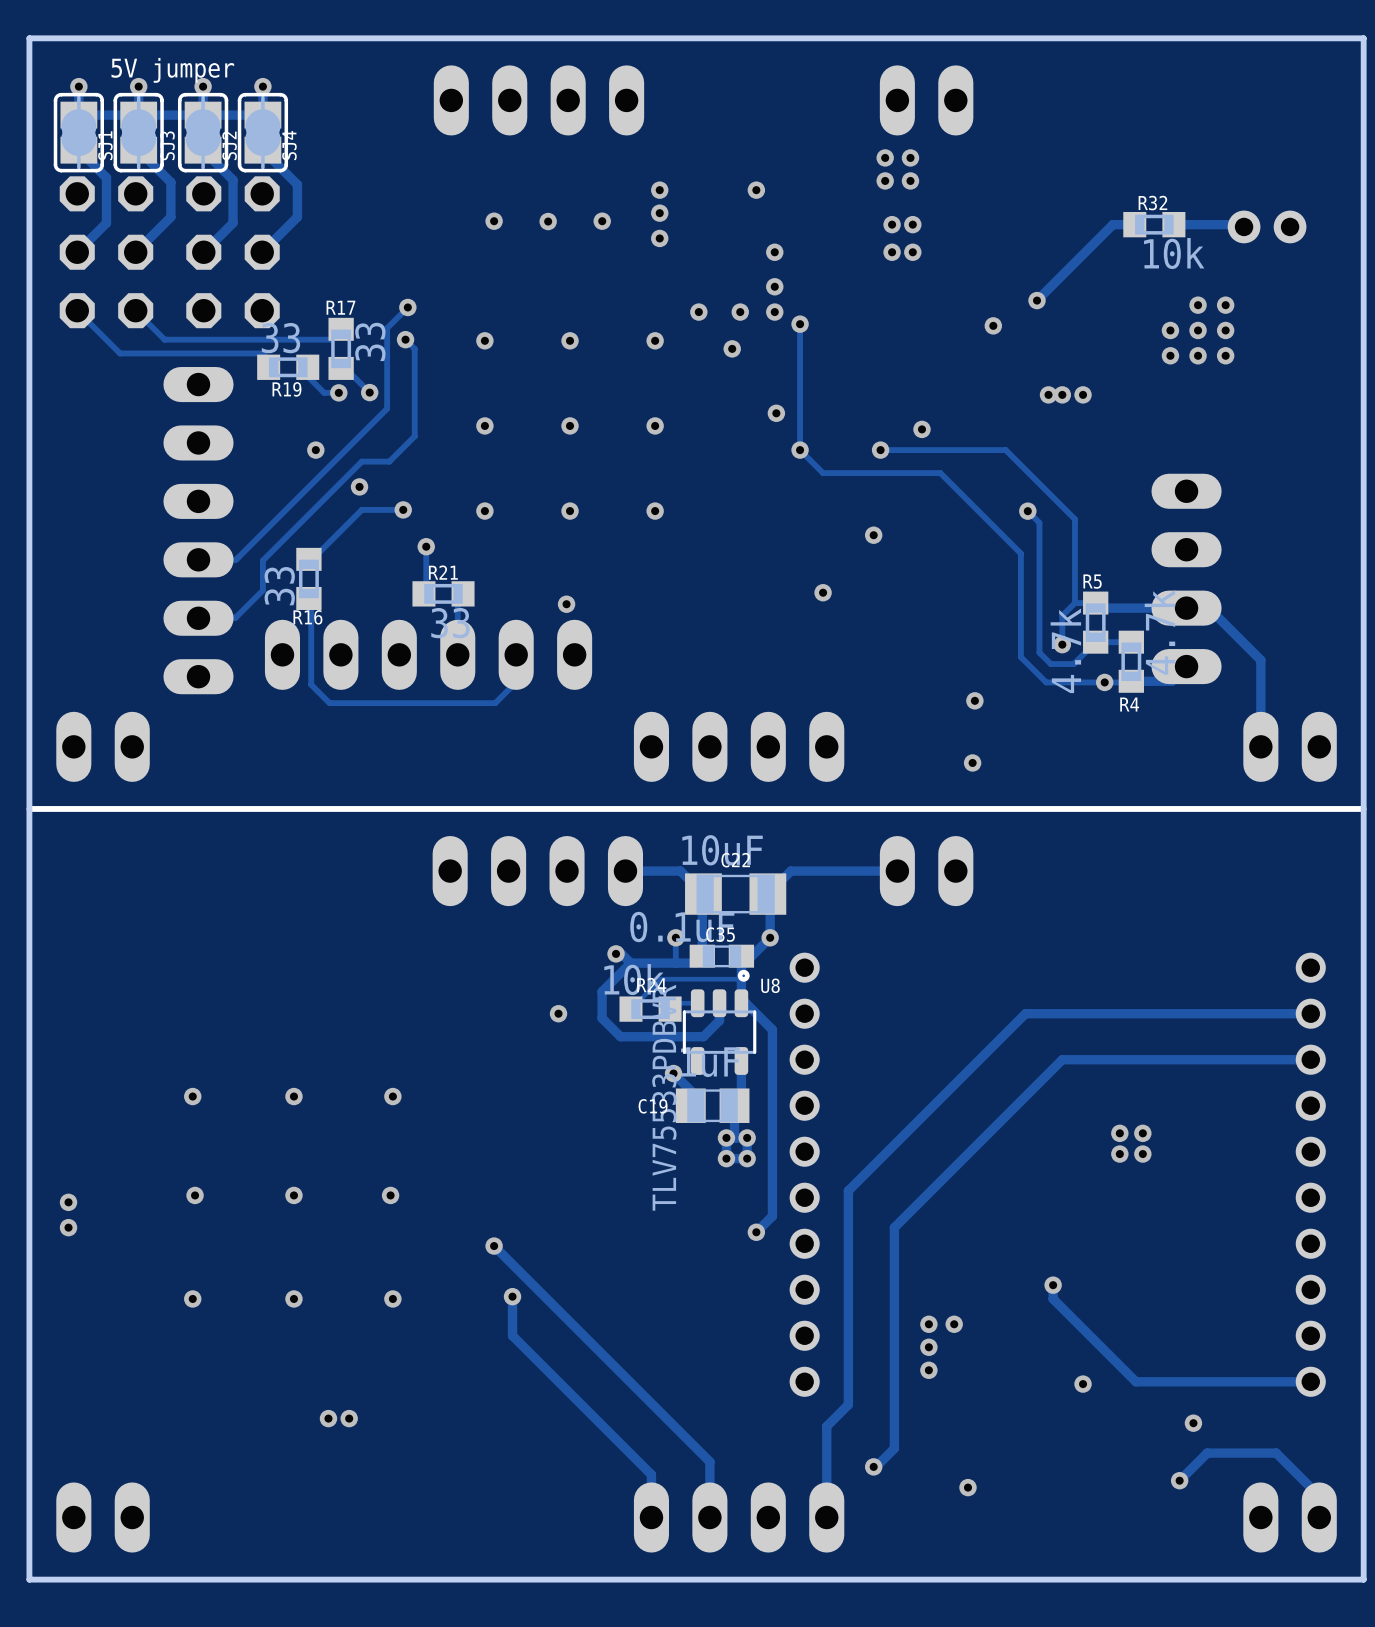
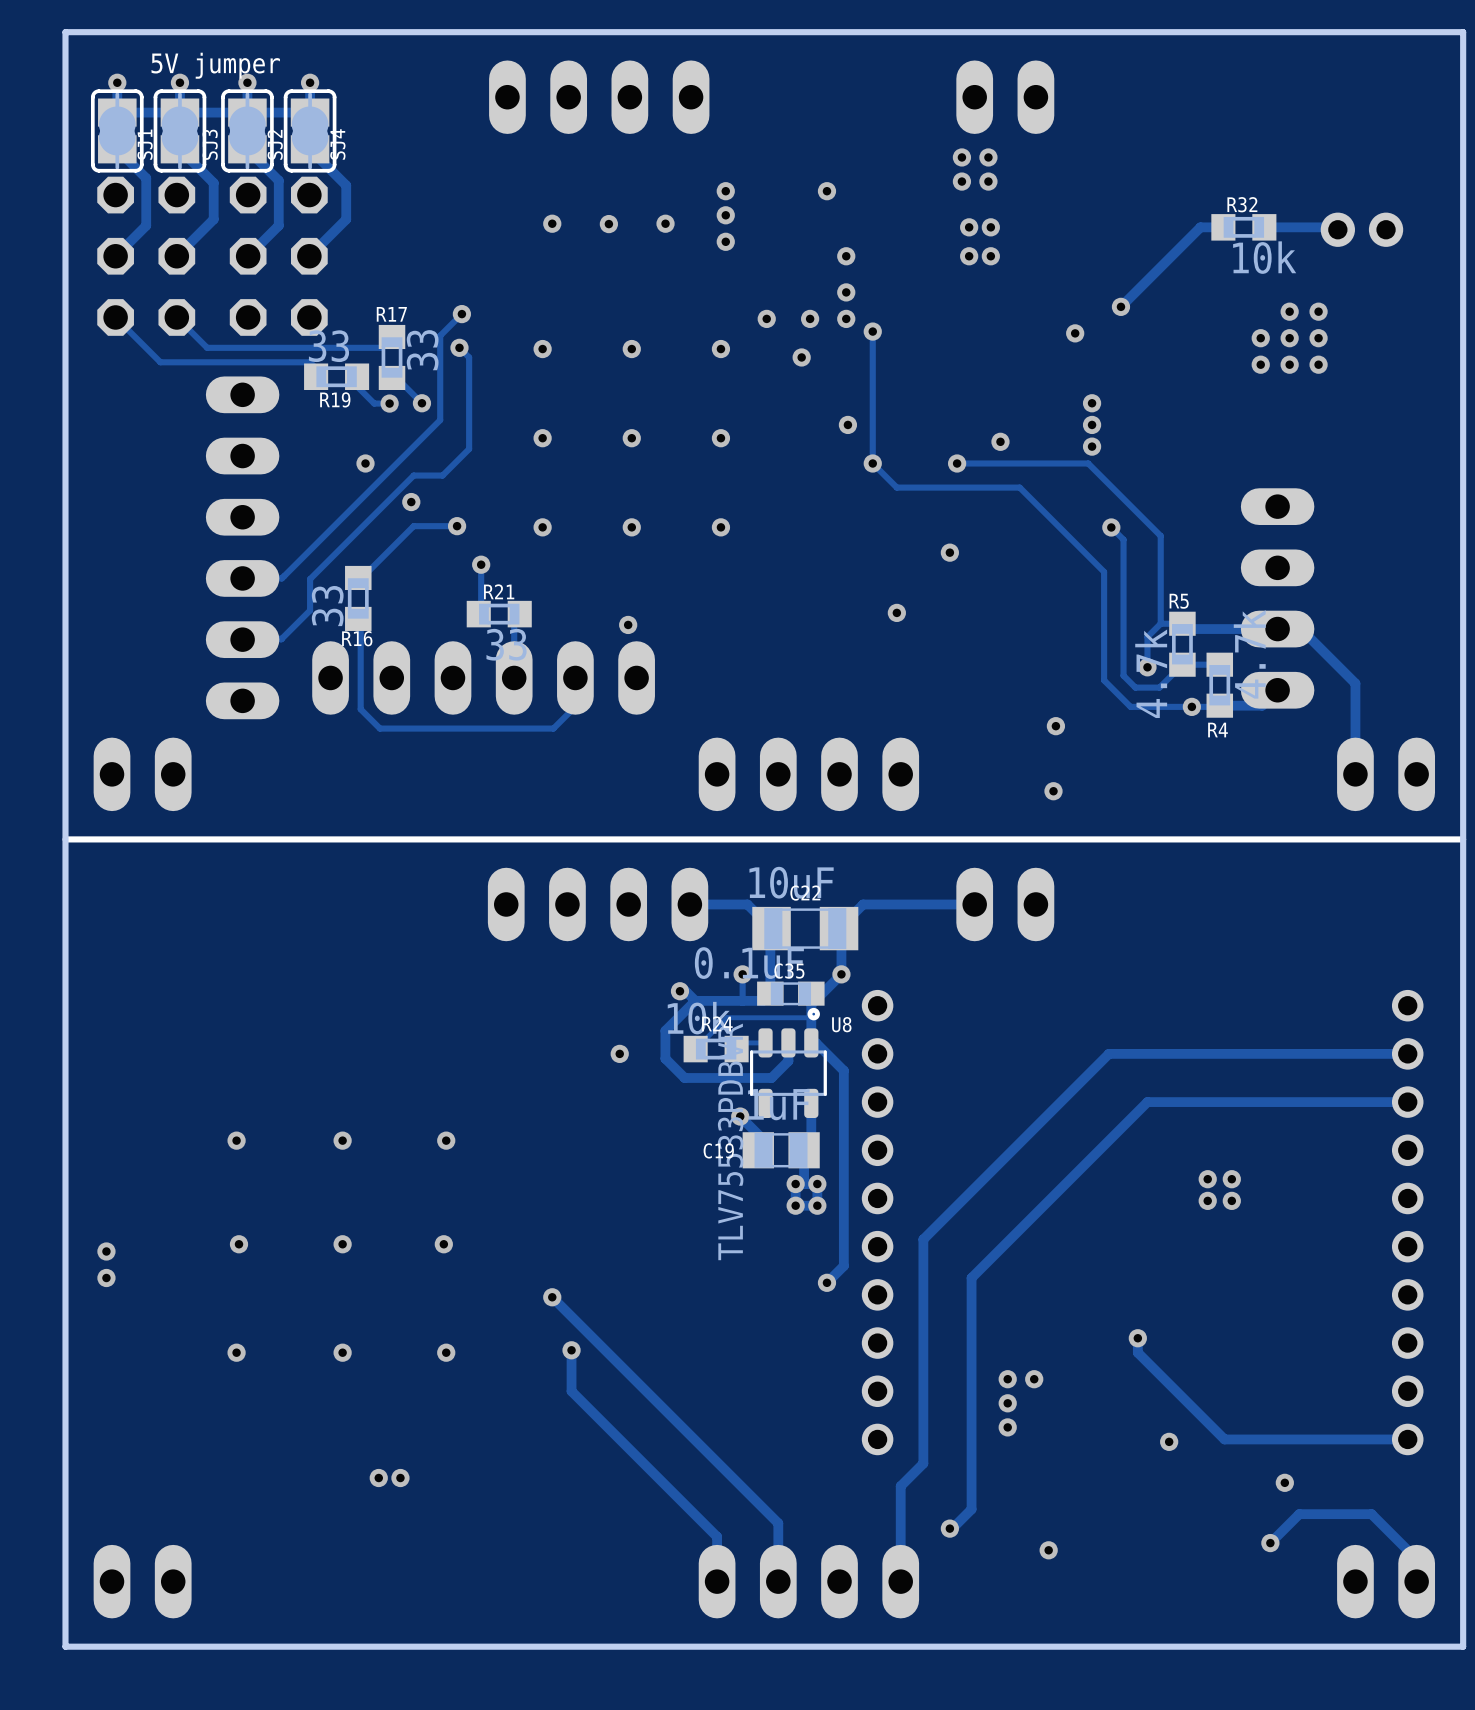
via: none -> (1092, 403)
via: (1048, 394) -> none
via: (1062, 394) -> none
via: (1083, 394) -> none
via: none -> (1092, 424)
via: none -> (1092, 446)

